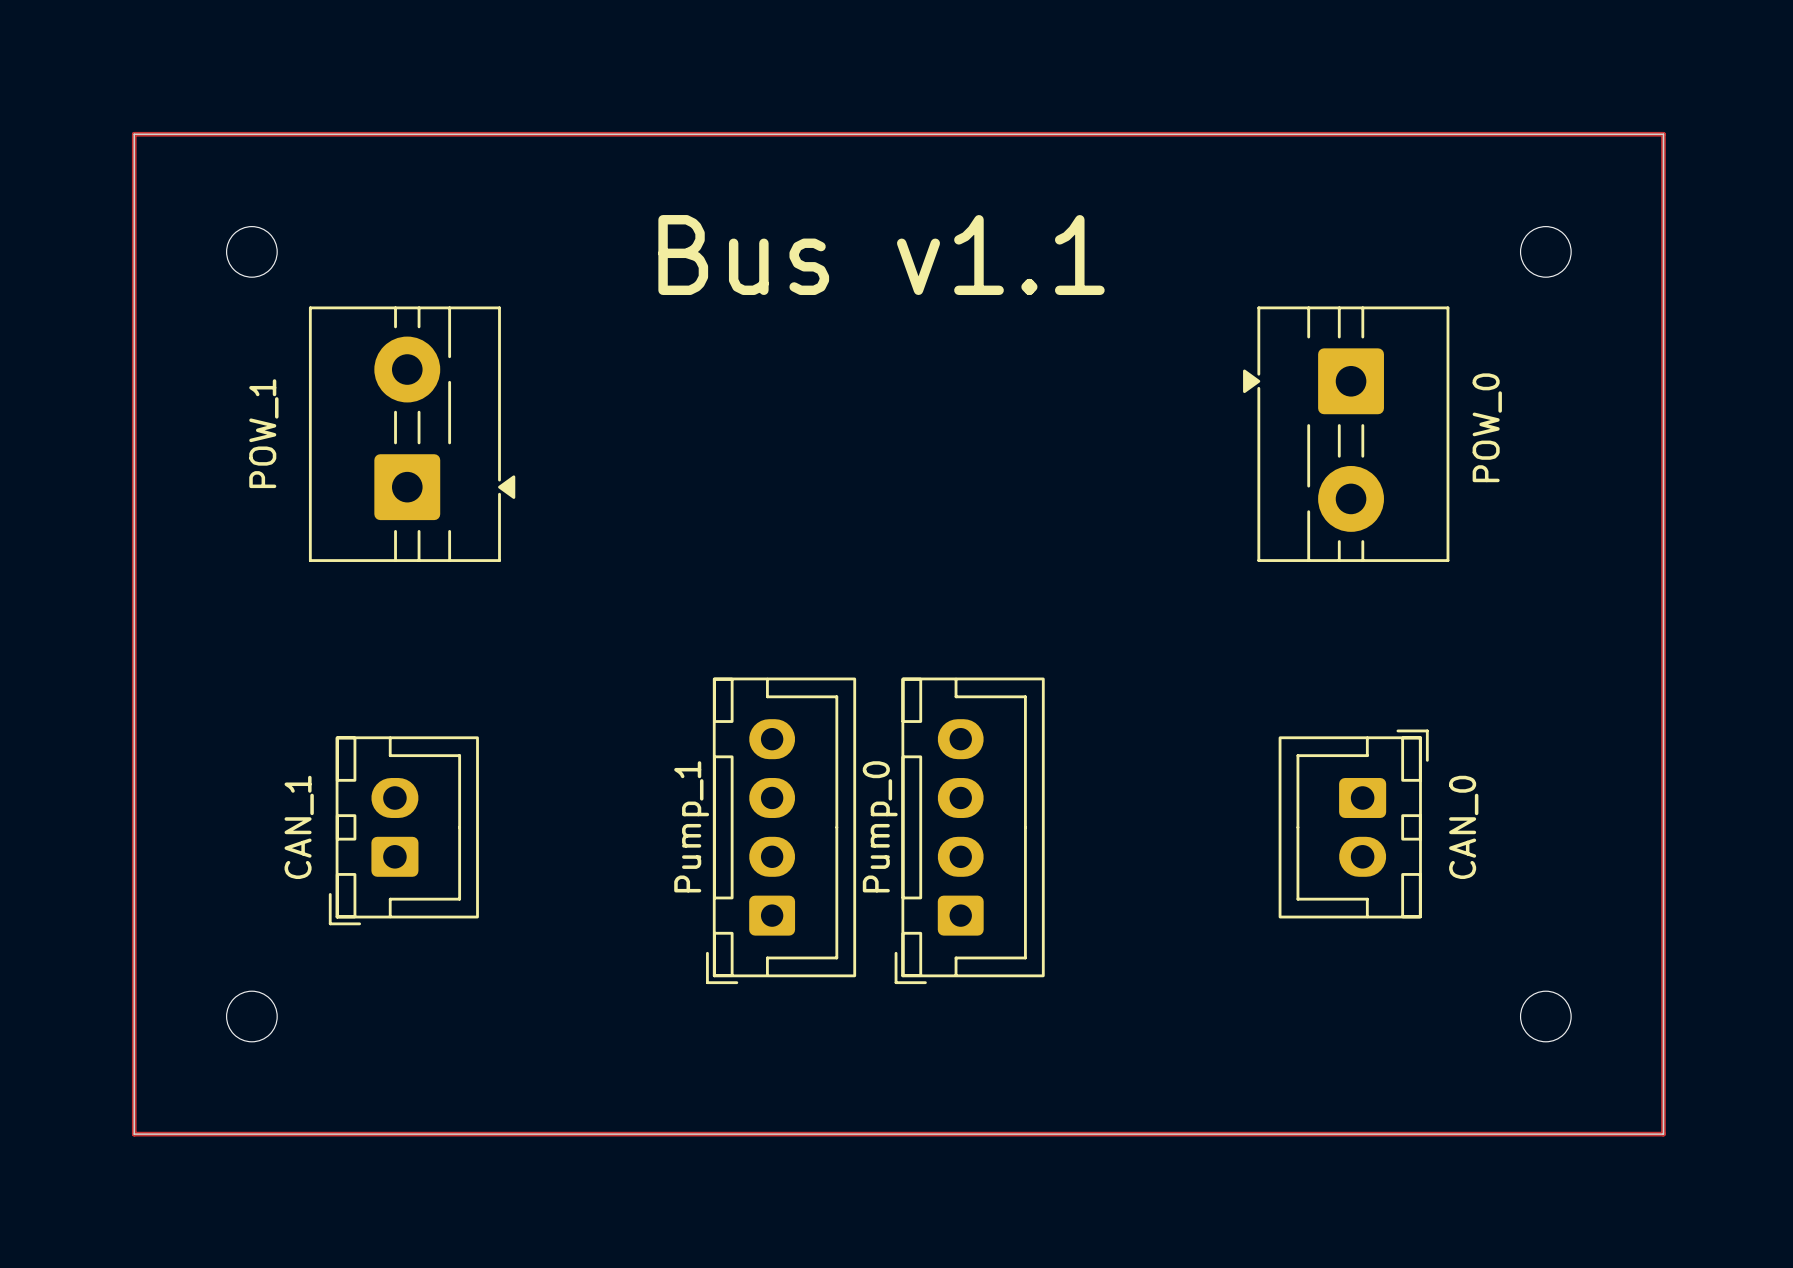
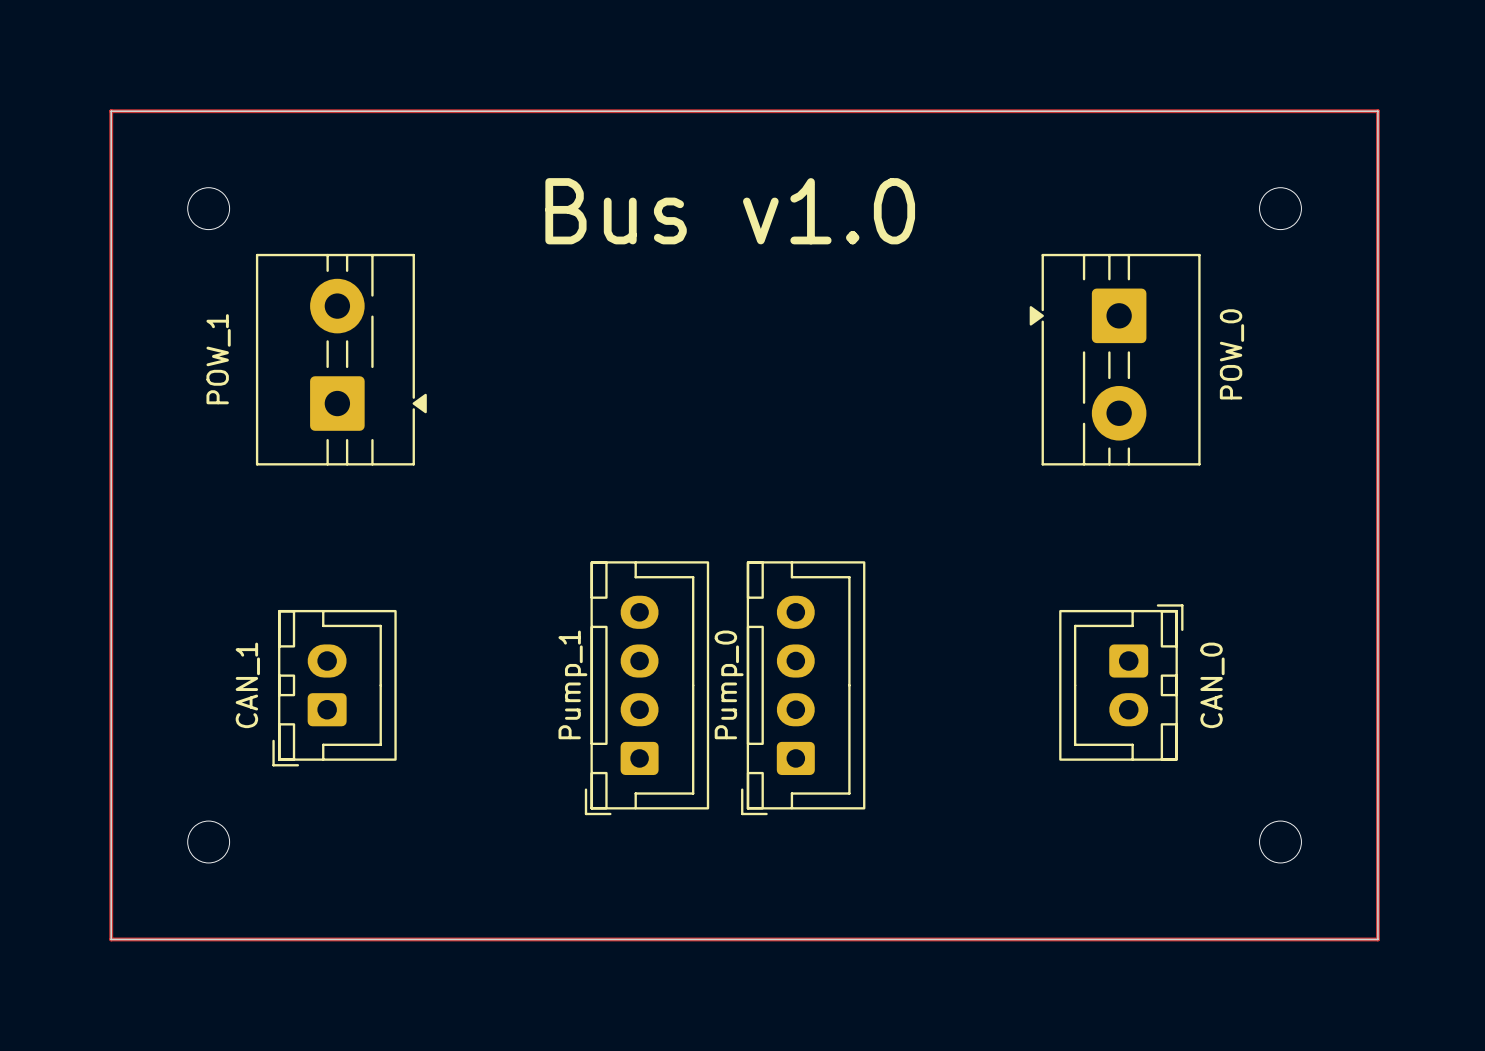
text: Bus v1.1 (881, 255) -> Bus v1.0 (730, 211)

